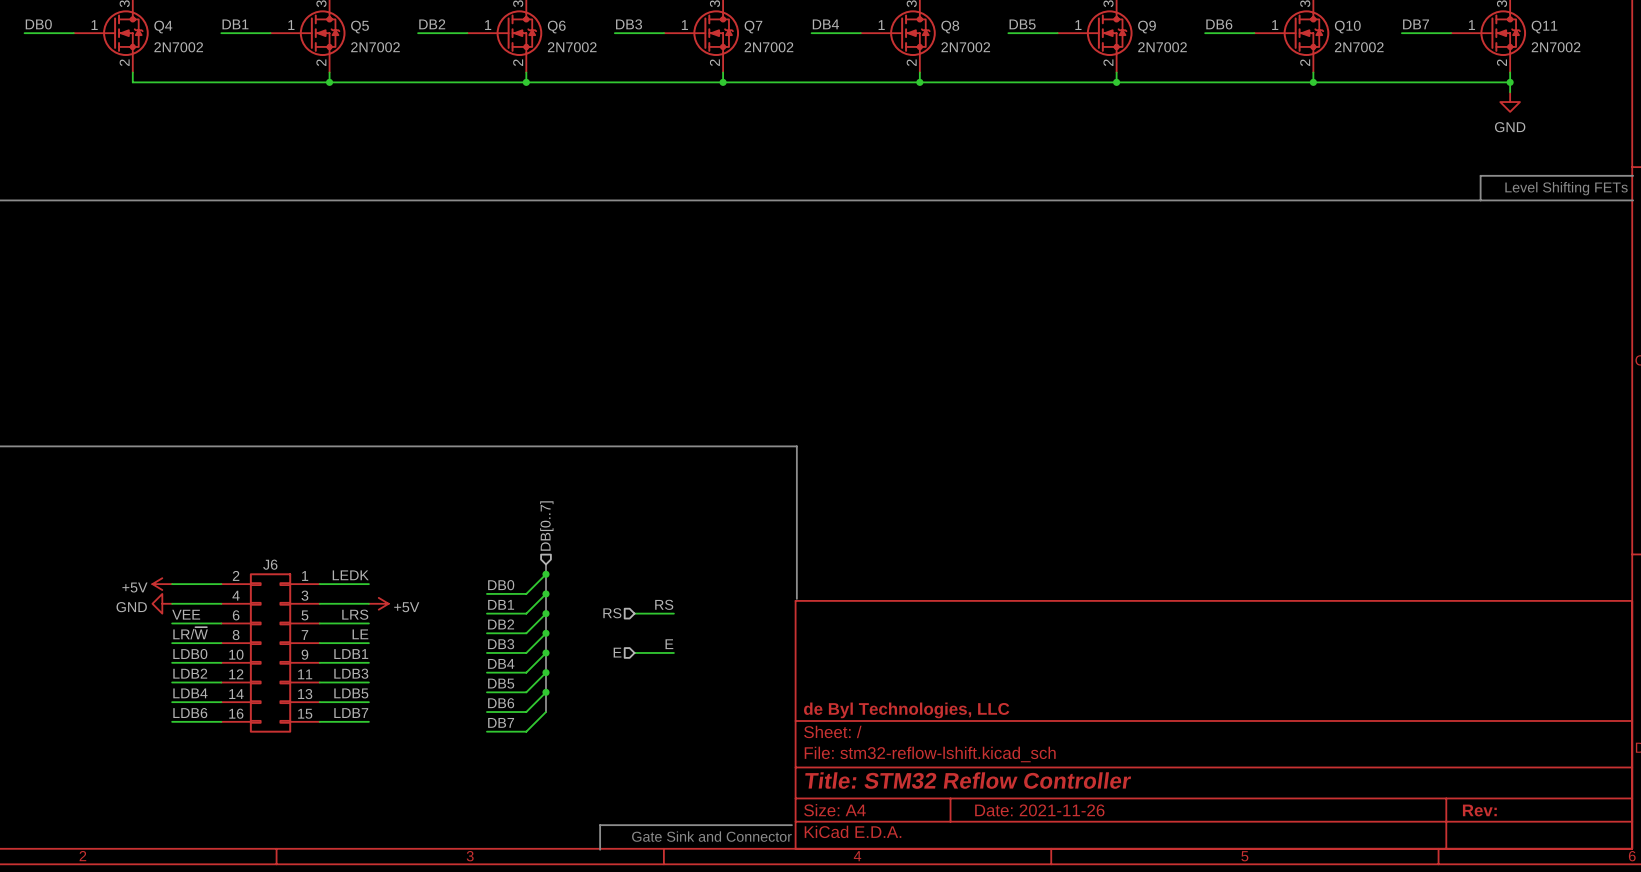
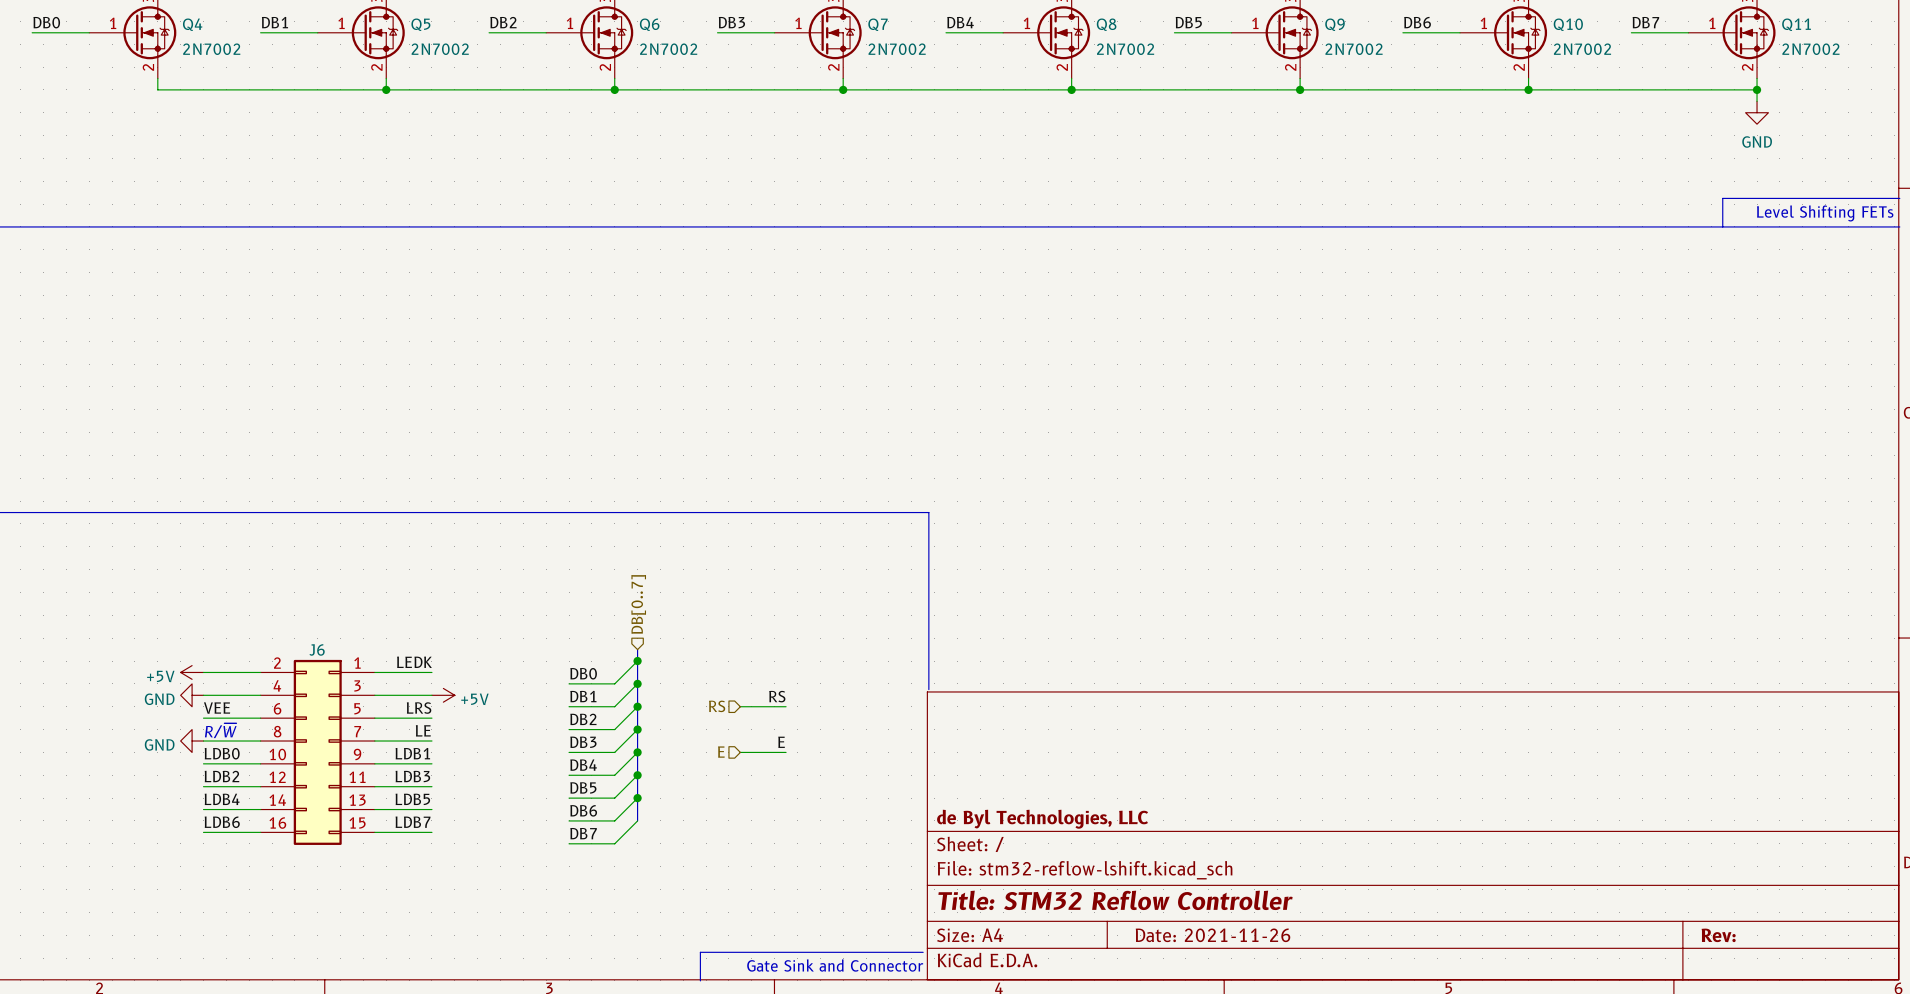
label: LR/~{W} (190, 633) -> none
text: none -> R/~{W} (220, 730)
power symbol: none -> GND (192, 741)

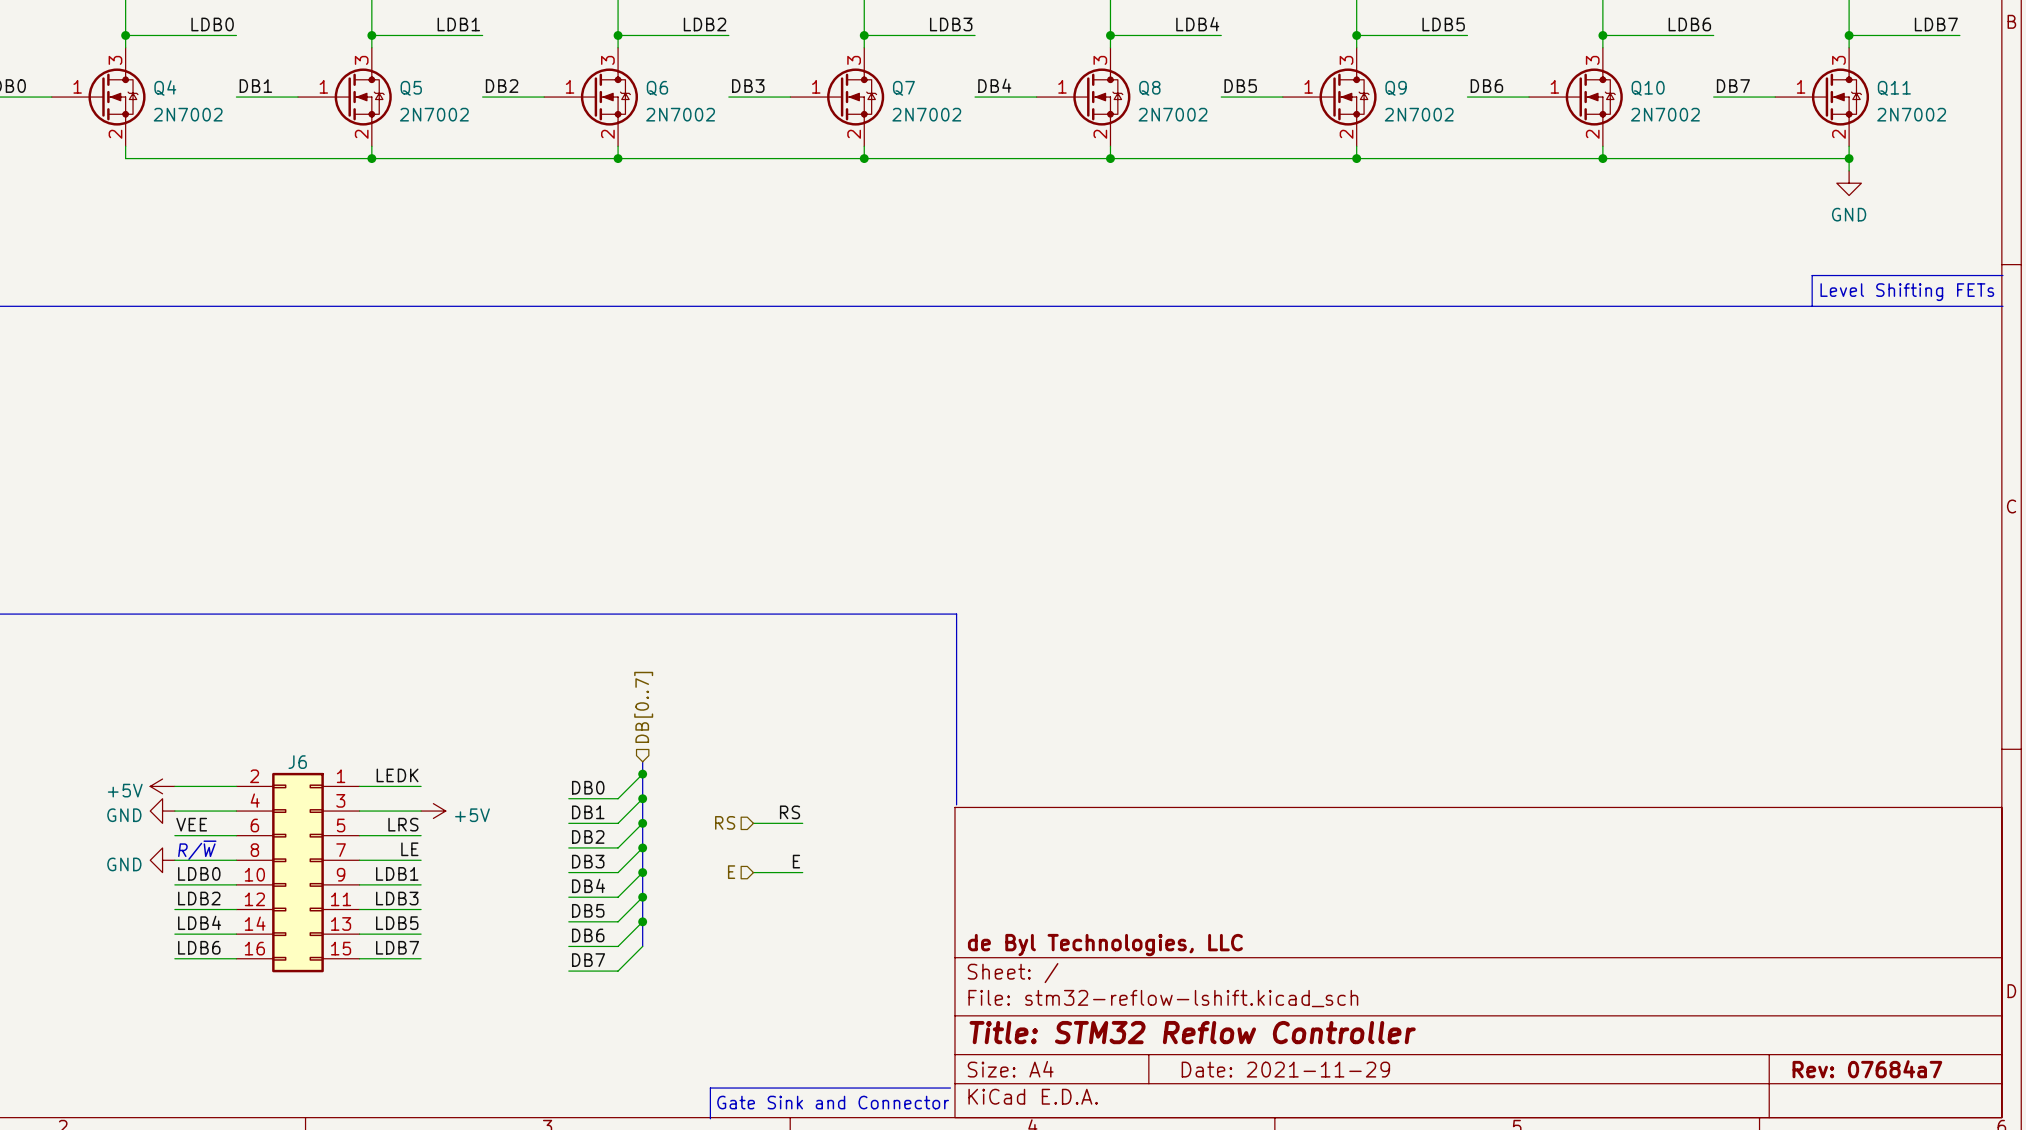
title block: Date: 2021-11-26 (1213, 935) -> Date: 2021-11-29 (1285, 1069)
title block: Rev: (1718, 935) -> Rev: 07684a7 (1867, 1069)

